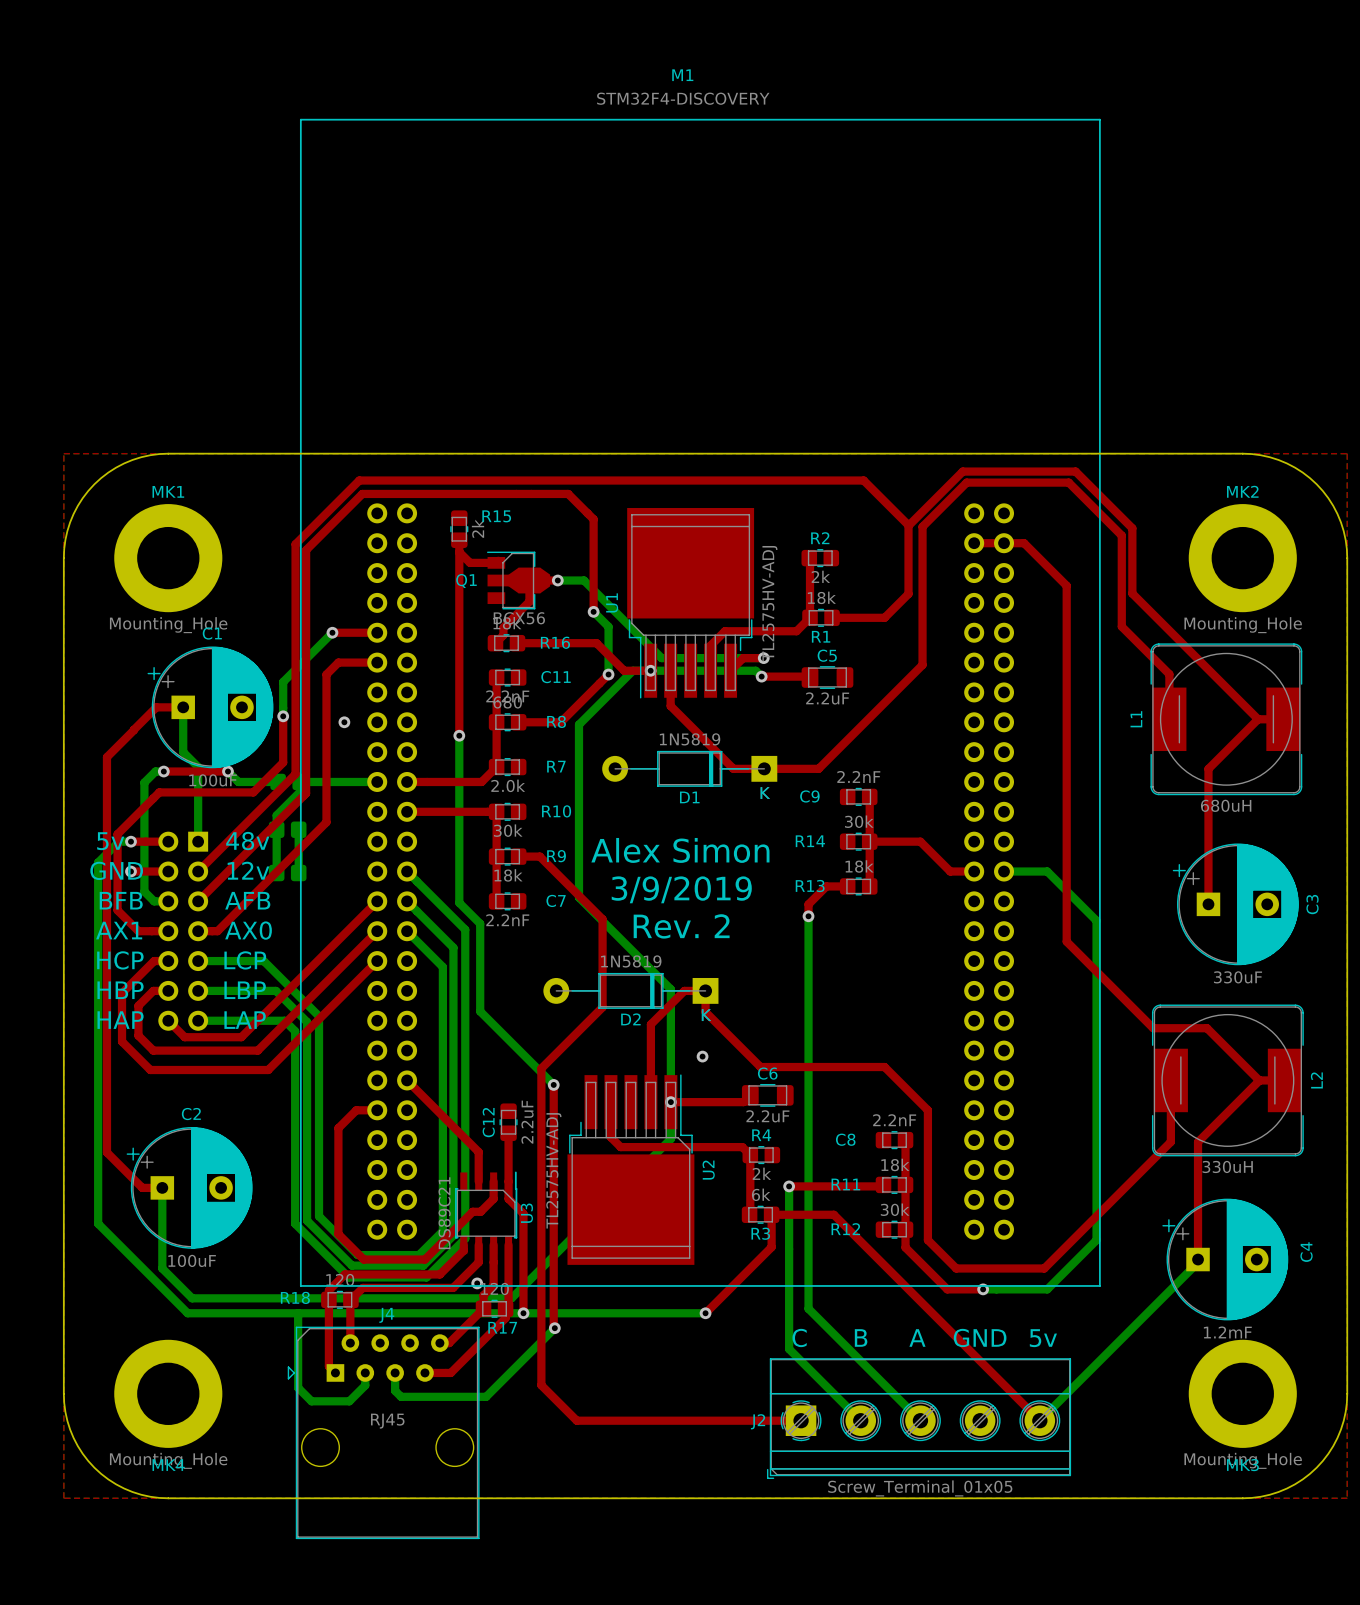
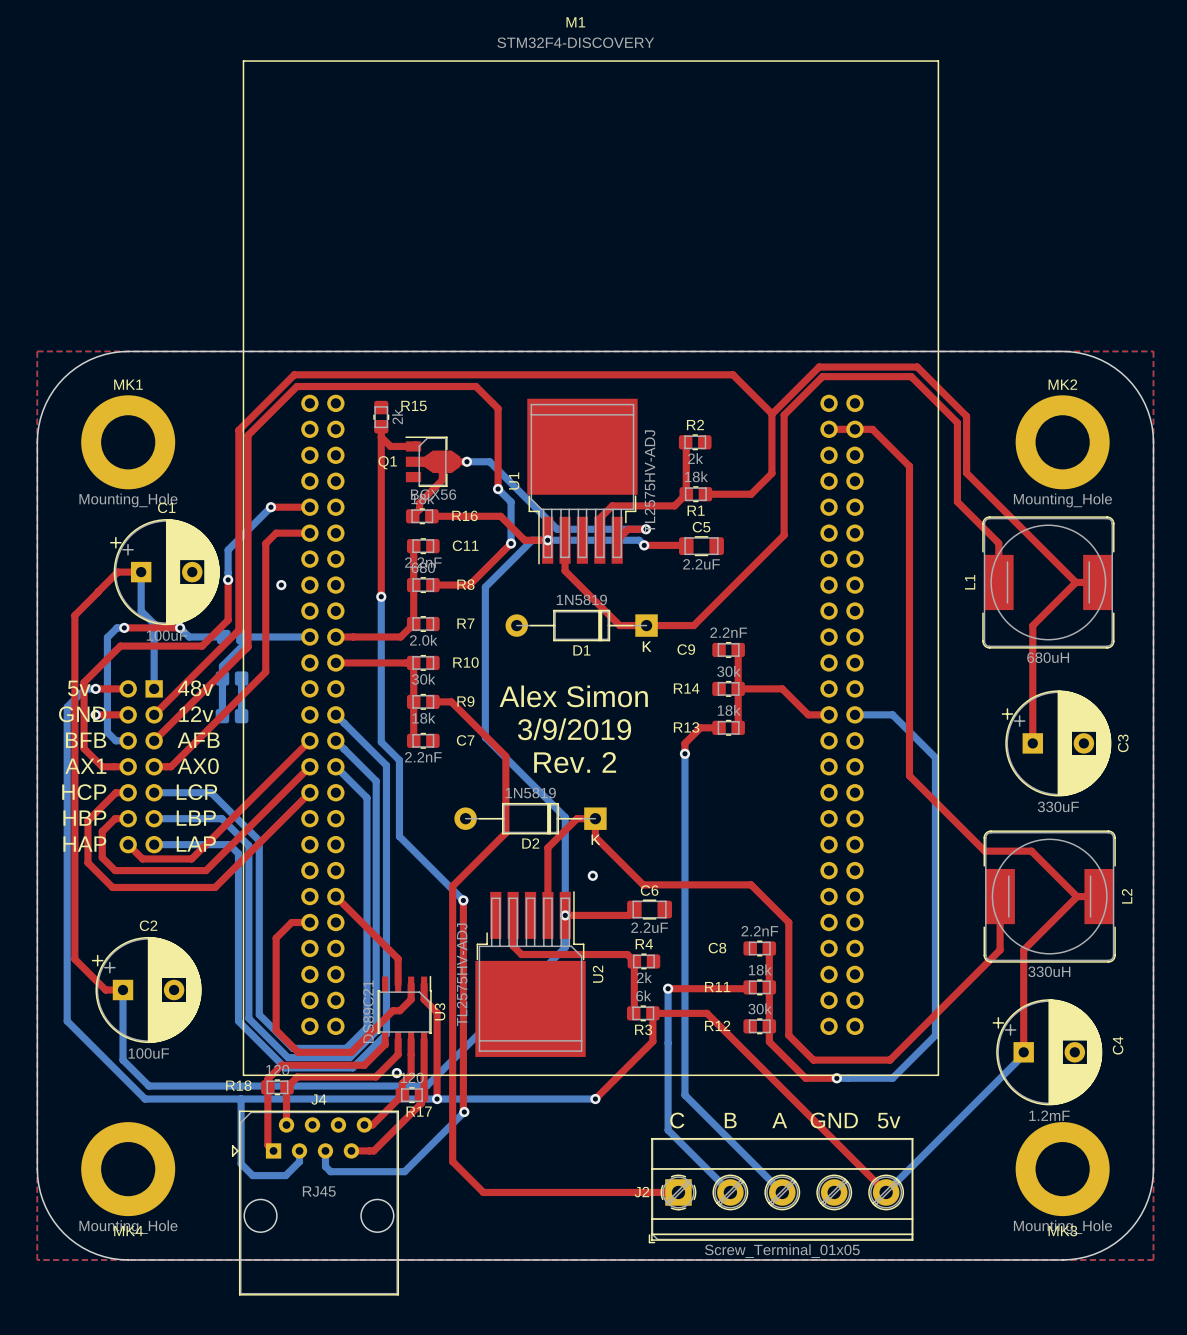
C12: 2.2uF (508, 1122) -> none
top track: (508, 1133) (508, 1181) -> none

